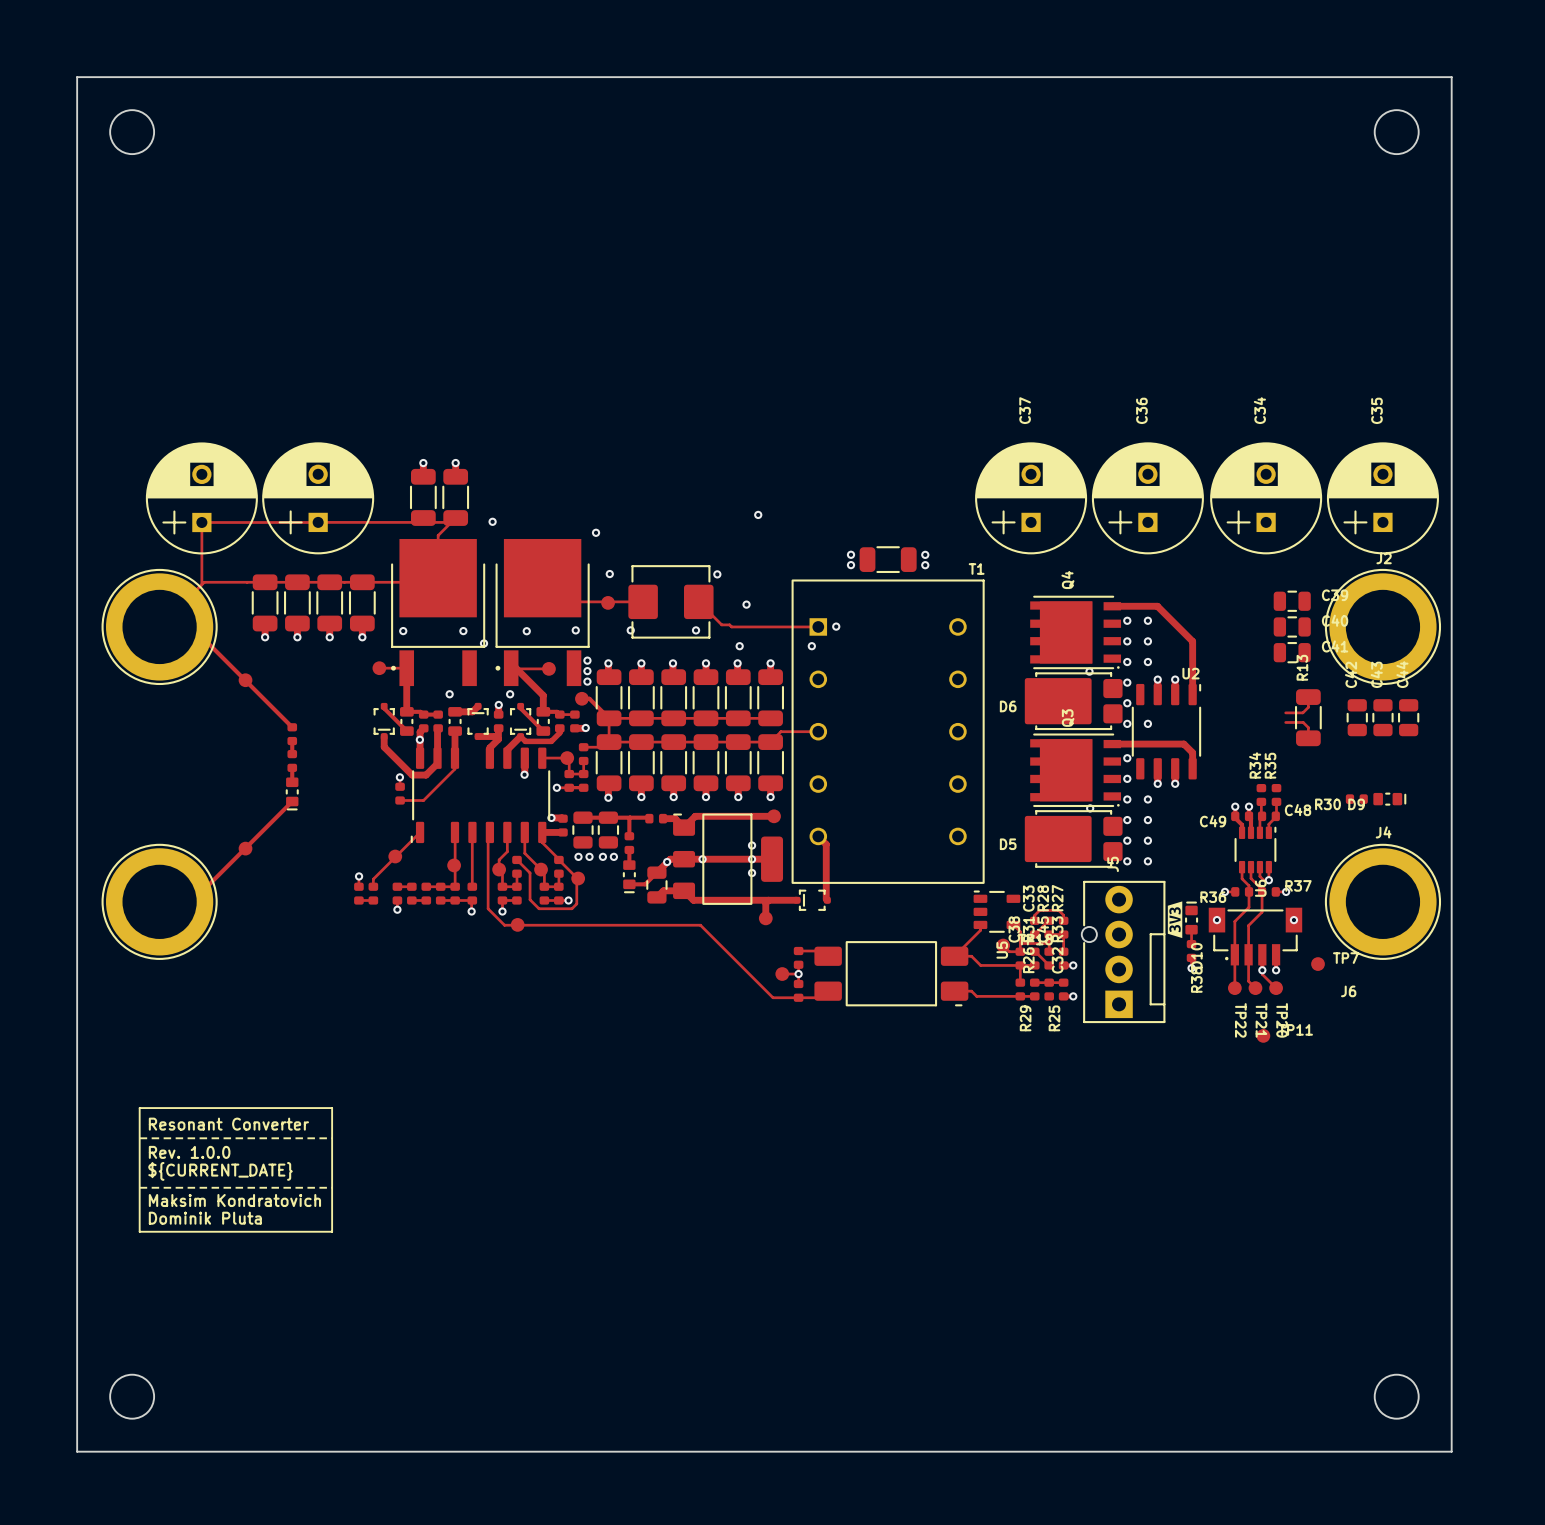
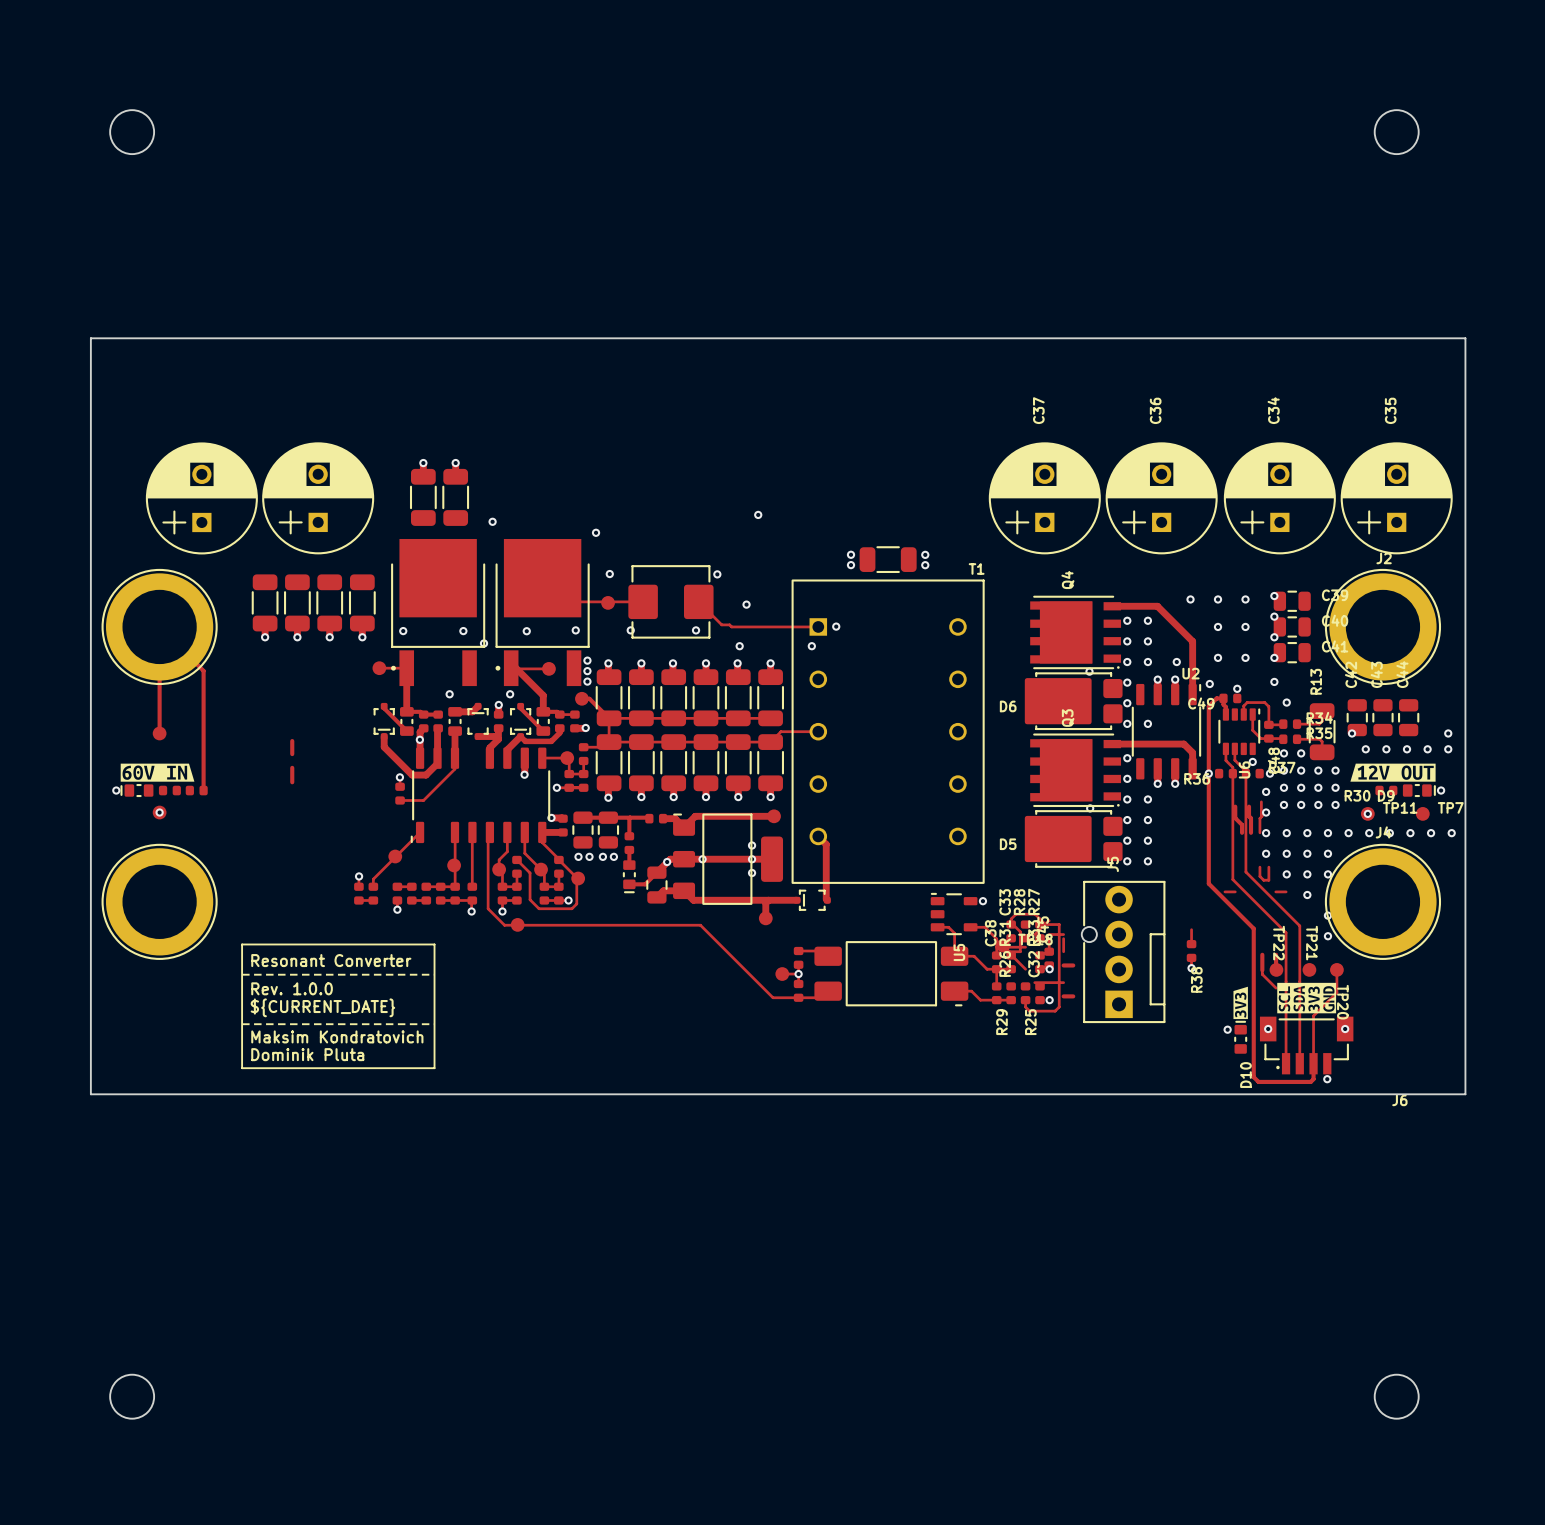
board edge: (77, 77) (1451, 77) (1451, 1451) (77, 1451) (77, 77) -> (90, 338) (90, 1094) (1465, 1094) (1465, 338) (90, 338)
C37 position: (1031, 498) -> (1044, 498)
C36 position: (1147, 498) -> (1161, 498)
C34 position: (1266, 498) -> (1279, 498)
C35 position: (1382, 498) -> (1396, 498)
track: (455, 518) (438, 535) (438, 578) (434, 582) (204, 582) (159, 626) (191, 626) (292, 727) -> none
track: (318, 522) (451, 522) -> none
track: (318, 522) (201, 522) (201, 584) -> none
via: none -> (1274, 596)
via: none -> (1190, 599)
via: none -> (1218, 599)
via: none -> (1245, 599)
via: none -> (1274, 616)
via: none -> (1218, 626)
via: none -> (1245, 626)
via: none -> (1274, 637)
via: none -> (1218, 657)
via: none -> (1245, 657)
via: none -> (1274, 657)
via: none -> (1176, 662)
part: (245, 680) -> none
via: none -> (1274, 681)
via: none -> (1209, 684)
via: none -> (1237, 688)
track: (1308, 697) (1308, 707) (1302, 712) (1285, 712) -> none
via: none -> (1286, 702)
track: none -> (1322, 711) (1322, 721) (1319, 724) (1297, 724)
track: none -> (1225, 714) (1223, 698) (1216, 698) (1208, 706) (1208, 883) (1253, 928) (1253, 1077) (1258, 1081) (1310, 1081) (1313, 1079) (1313, 1015) (1336, 992) (1336, 969)
track: none -> (1243, 714) (1243, 705) (1247, 702) (1264, 702) (1268, 706) (1268, 724) (1283, 724)
track: none -> (1252, 714) (1252, 730) (1260, 738) (1283, 739)
R13 position: (1308, 717) -> (1322, 731)
track: (1285, 722) (1303, 722) (1308, 727) (1308, 738) -> none
track: none -> (159, 733) (159, 626) (203, 670) (203, 790)
part: none -> (159, 733)
via: none -> (1352, 733)
via: none -> (1448, 733)
part: (292, 734) -> none
track: none -> (1297, 739) (1319, 739) (1322, 741) (1322, 752)
track: none -> (1225, 748) (1225, 760) (1232, 767) (1232, 879) (1286, 932) (1286, 1063)
track: none -> (1234, 748) (1234, 760) (1245, 771) (1245, 872) (1293, 920)
via: none -> (1365, 749)
via: none -> (1386, 749)
via: none -> (1407, 749)
via: none -> (1427, 749)
via: none -> (1448, 749)
via: none -> (1283, 753)
via: none -> (1301, 753)
part: (292, 760) -> none
via: none -> (1252, 761)
drawing: none -> [120, 763, 195, 782]
drawing: none -> [1350, 763, 1436, 782]
via: none -> (1283, 770)
via: none -> (1301, 770)
via: none -> (1318, 770)
via: none -> (1335, 770)
via: none -> (1208, 773)
via: none -> (1269, 773)
via: none -> (1283, 787)
via: none -> (1301, 787)
via: none -> (1318, 787)
via: none -> (1335, 787)
via: none -> (116, 790)
part: none -> (169, 790)
part: none -> (196, 790)
via: none -> (1441, 790)
via: none -> (1266, 791)
part rotation: 0° (292, 793) -> 90° clockwise (136, 790)
part position: (292, 793) -> (136, 790)
R34 rotation: 0° (1261, 794) -> 90° clockwise (1290, 724)
R34 position: (1261, 794) -> (1290, 724)
R35 rotation: 0° (1276, 794) -> 90° clockwise (1290, 739)
R35 position: (1276, 794) -> (1290, 739)
R30 position: (1356, 799) -> (1386, 790)
D9 position: (1389, 799) -> (1419, 790)
track: (292, 801) (191, 901) (159, 901) -> none
track: (1276, 801) (1276, 815) (1268, 824) (1268, 832) -> none
via: none -> (1283, 804)
via: none -> (1301, 804)
via: none -> (1318, 804)
via: none -> (1335, 804)
via: (1235, 806) -> none
via: (1249, 806) -> none
part: none -> (159, 812)
via: none -> (159, 812)
via: none -> (1266, 812)
via: none -> (1367, 813)
C49 position: (1242, 816) -> (1230, 698)
C48 rotation: 0° (1268, 816) -> 90° clockwise (1268, 731)
C48 position: (1268, 816) -> (1268, 731)
via: none -> (1266, 833)
via: none -> (1286, 833)
via: none -> (1307, 833)
via: none -> (1327, 833)
via: none -> (1348, 833)
via: none -> (1369, 833)
via: none -> (1389, 833)
via: none -> (1410, 833)
via: none -> (1431, 833)
via: none -> (1451, 833)
part: (245, 848) -> none
U6 position: (1255, 849) -> (1239, 731)
via: none -> (1266, 853)
via: none -> (1286, 853)
via: none -> (1307, 853)
via: none -> (1327, 853)
track: (1242, 867) (1242, 878) (1249, 885) (1249, 907) (1234, 921) (1234, 988) -> none
track: (1251, 867) (1251, 878) (1262, 889) (1262, 912) (1248, 925) (1248, 981) (1255, 988) -> none
via: none -> (1286, 874)
via: none -> (1307, 874)
via: none -> (1327, 874)
via: (1268, 880) -> none
via: (1224, 891) -> none
R36 position: (1242, 891) -> (1225, 773)
R37 position: (1268, 891) -> (1252, 773)
via: (1286, 891) -> none
via: none -> (1307, 894)
via: none -> (982, 901)
drawing: [1167, 901, 1183, 939] -> none
U5 position: (996, 911) -> (954, 914)
via: none -> (1327, 915)
D10 position: (1191, 918) -> (1240, 1037)
track: (1034, 920) (1034, 915) (1039, 910) (1058, 910) (1063, 915) (1063, 920) -> none
via: (1216, 920) -> none
via: (1293, 920) -> none
track: none -> (1295, 921) (1299, 925) (1299, 1063)
track: (980, 924) (980, 930) (954, 956) -> (937, 927) (948, 927) (954, 933) (954, 956)
track: none -> (1011, 924) (1011, 919) (1015, 914) (1035, 914) (1040, 919) (1040, 924) (1059, 924) (1059, 1007) (1055, 1011) (1029, 1011) (1025, 1007) (1025, 1000)
track: none -> (970, 927) (985, 927) (996, 938) (996, 955)
C33 position: (1034, 927) -> (1011, 931)
R28 position: (1049, 927) -> (1025, 931)
R27 position: (1063, 927) -> (1040, 931)
J6 position: (1255, 936) -> (1306, 1045)
via: none -> (1327, 936)
track: (1020, 943) (1049, 943) -> (996, 947) (1025, 947)
track: (1034, 951) (1049, 965) -> (1011, 955) (1025, 969)
track: (971, 956) (980, 965) (1034, 965) -> (971, 956) (974, 956) (987, 969) (1011, 969)
C38 position: (1020, 958) -> (996, 962)
R31 position: (1034, 958) -> (1011, 962)
R33 position: (1063, 958) -> (1040, 962)
TP7 position: (1318, 964) -> (1422, 813)
via: (1073, 965) -> none
track: (1020, 969) (1020, 982) -> (996, 973) (996, 986)
via: none -> (1049, 969)
via: (1262, 970) -> none
via: (1276, 970) -> none
drawing: none -> [1277, 982, 1337, 1014]
drawing: none -> [1233, 986, 1248, 1020]
TP22 position: (1234, 988) -> (1276, 969)
TP21 position: (1255, 988) -> (1309, 969)
TP20 position: (1276, 988) -> (1336, 969)
R29 position: (1020, 989) -> (996, 993)
R26 position: (1034, 989) -> (1011, 993)
R25 position: (1049, 989) -> (1025, 993)
C32 position: (1063, 989) -> (1040, 993)
track: (976, 996) (1034, 996) -> (976, 996) (980, 1000) (1011, 1000)
via: (1073, 996) -> none
via: none -> (1049, 1000)
TP22 name position: TP22 (1240, 1020) -> TP22 (1278, 943)
TP21 name position: TP21 (1261, 1020) -> TP21 (1311, 943)
via: none -> (1227, 1029)
via: none -> (1268, 1029)
via: none -> (1345, 1029)
TP11 position: (1263, 1035) -> (1367, 813)
via: none -> (1327, 1079)
line: (139, 1108) (332, 1108) (332, 1231) (139, 1231) (139, 1108) -> (242, 944) (434, 944) (434, 1068) (242, 1068) (242, 944)
text position: Resonant Converter (228, 1124) -> Resonant Converter (331, 960)
line: (139, 1138) (332, 1138) -> (242, 974) (434, 974)
text position: Rev. 1.0.0 (189, 1152) -> Rev. 1.0.0 (292, 988)
text position: ${CURRENT_DATE} (220, 1171) -> ${CURRENT_DATE} (322, 1007)
line: (139, 1187) (332, 1187) -> (242, 1024) (434, 1024)
text position: Maksim Kondratovich (234, 1200) -> Maksim Kondratovich (337, 1036)
text position: Dominik Pluta (205, 1218) -> Dominik Pluta (307, 1054)

